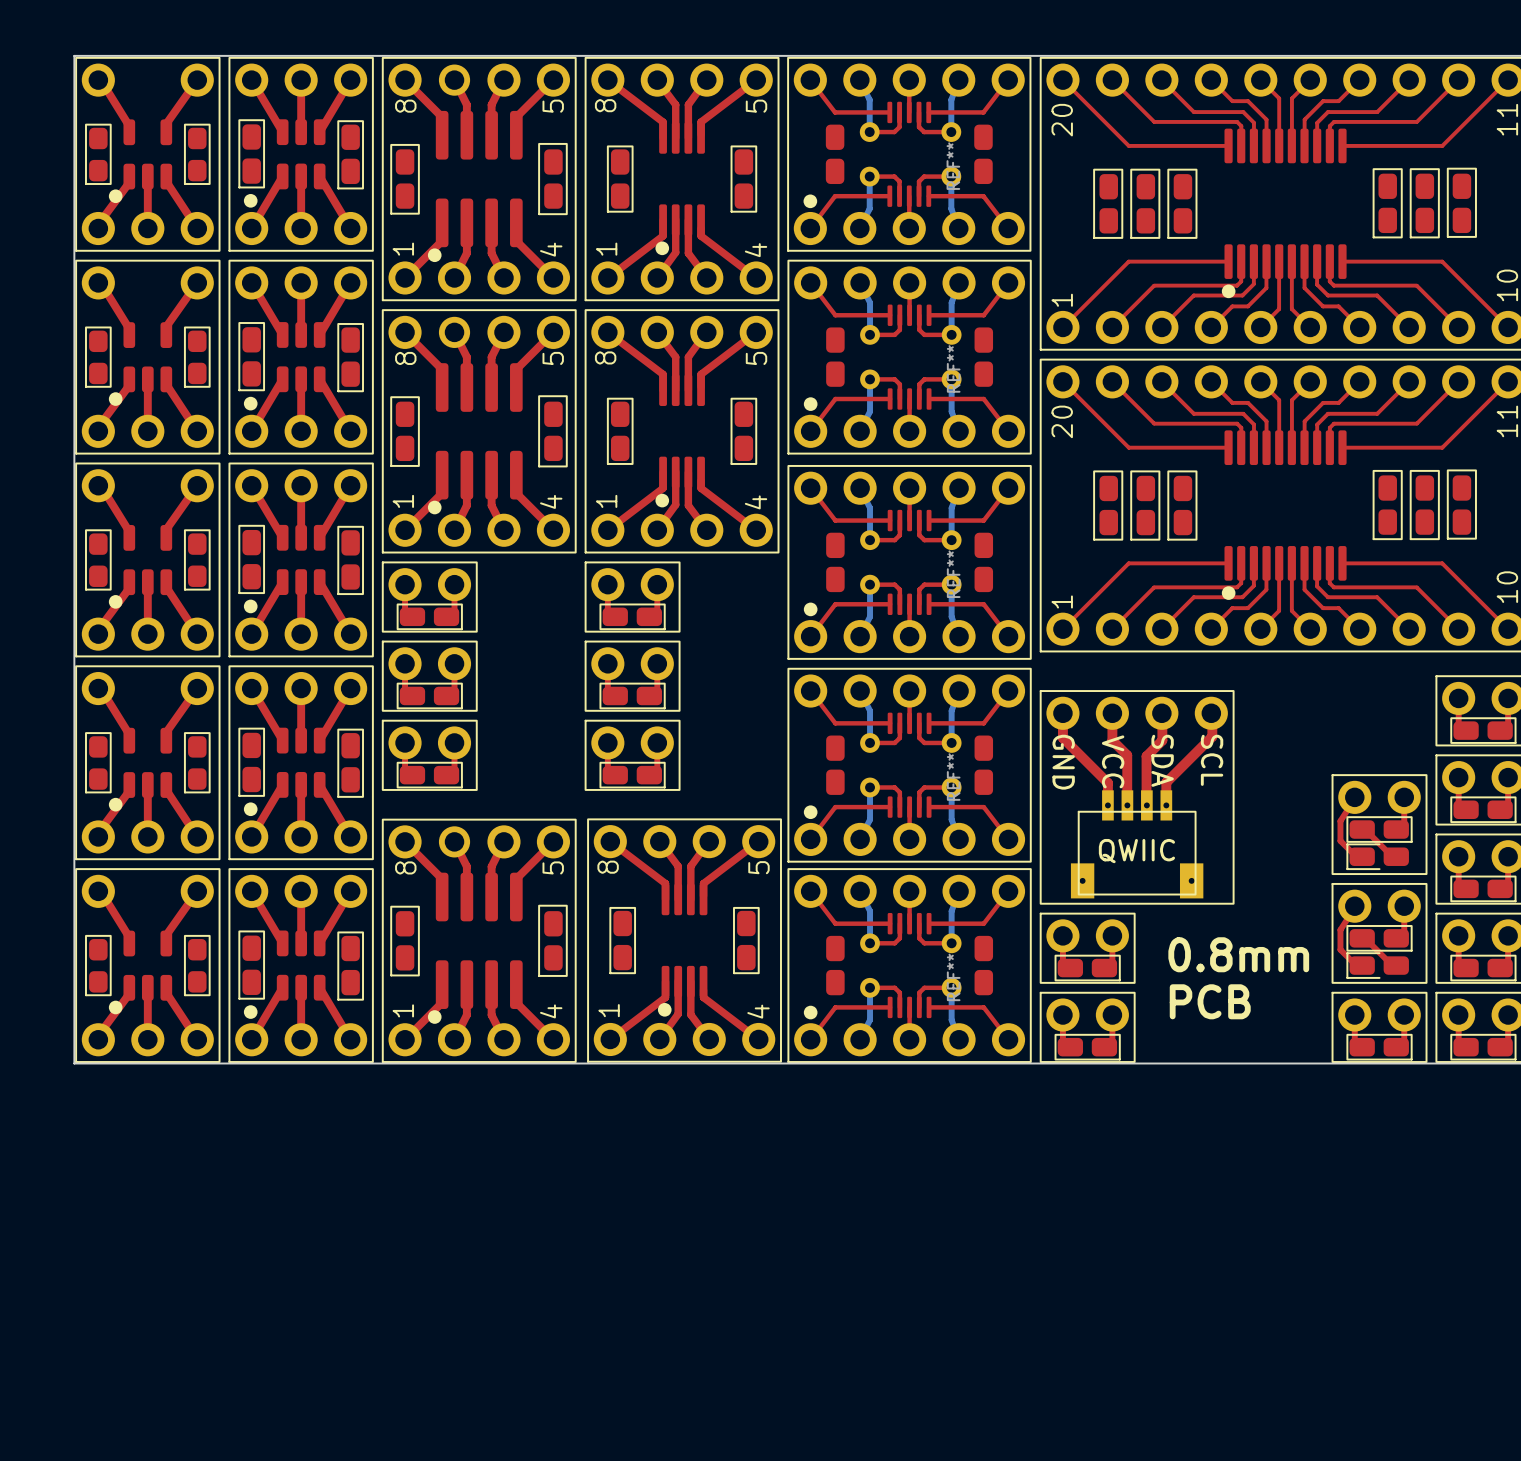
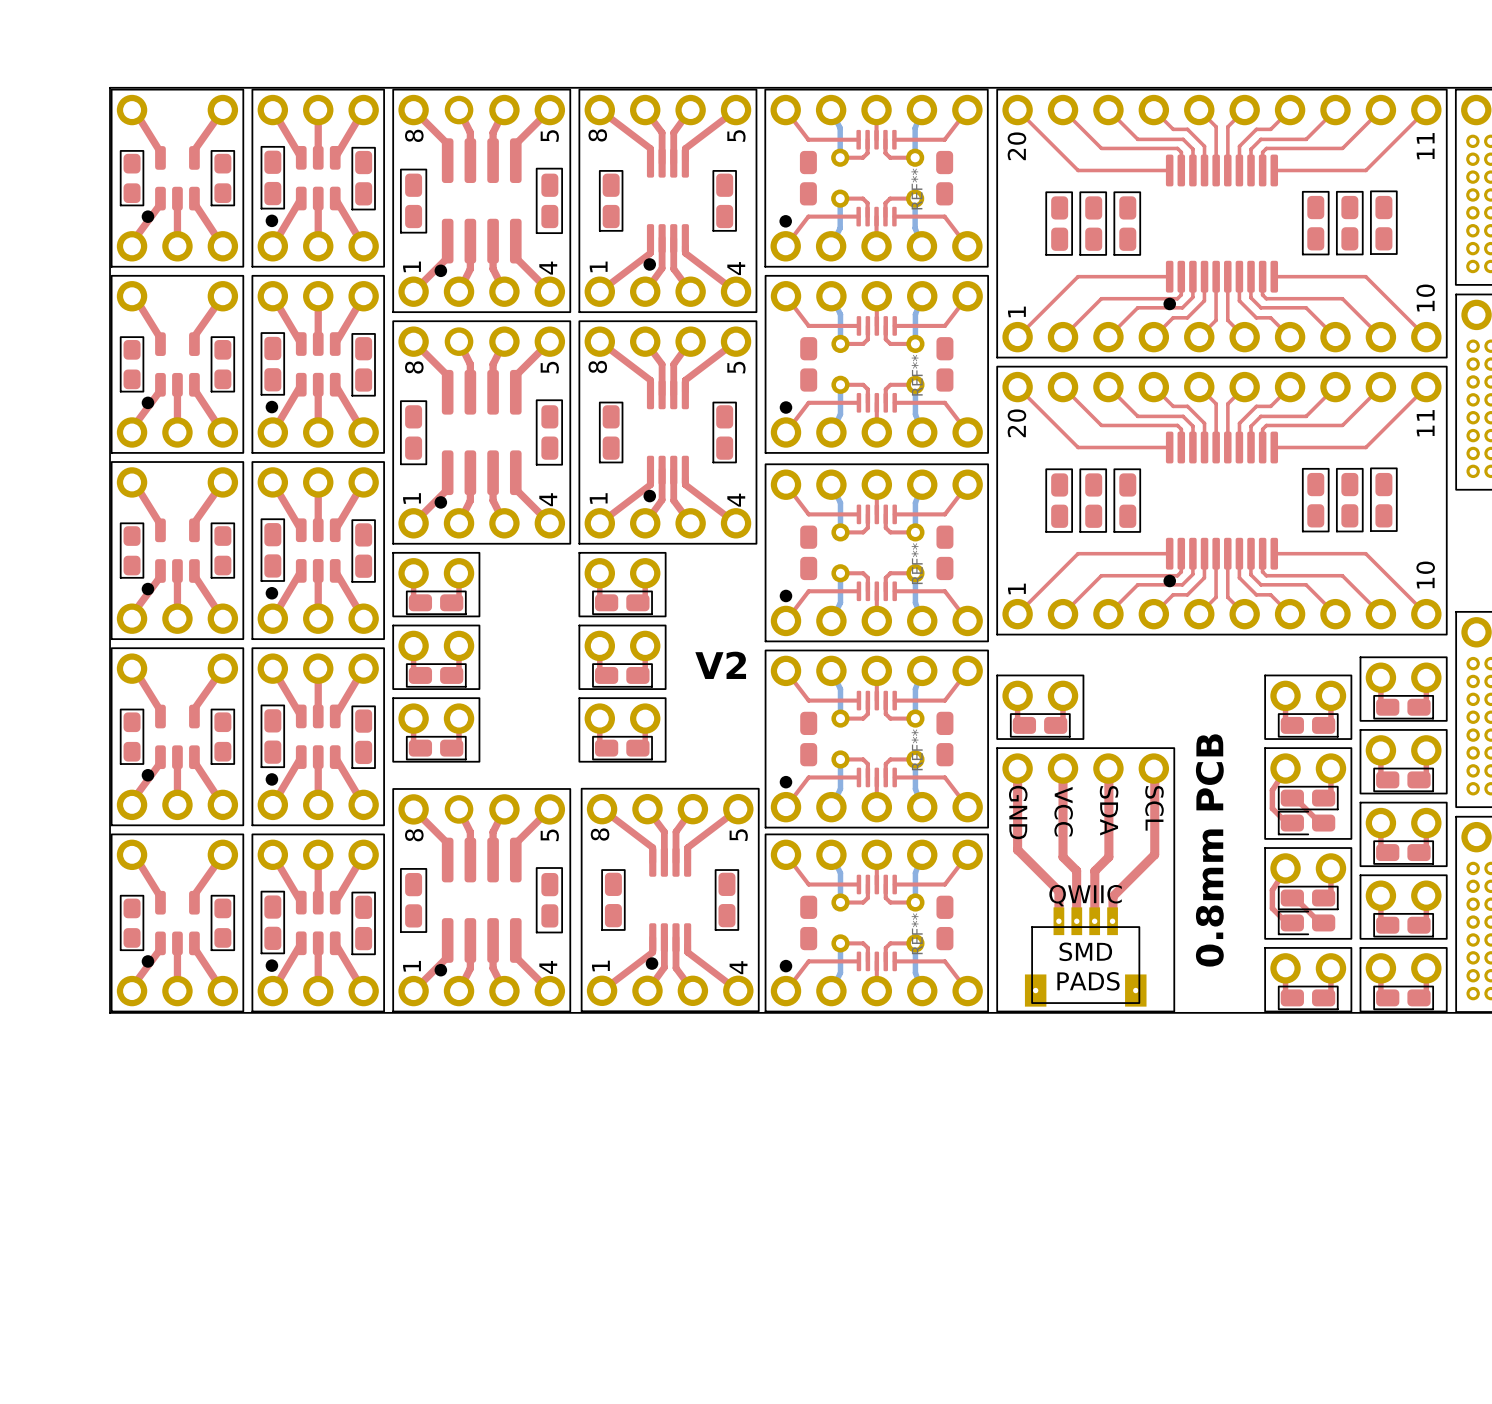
text: none -> V2 (720, 665)
part: none -> (1040, 707)
part: none -> (1308, 707)
part: (1137, 797) -> none
part: none -> (1085, 879)
part: (1087, 948) -> none
text: 0.8mm (1238, 954) -> 0.8mm PCB (1209, 850)
text: PCB (1210, 1001) -> none
part: (1087, 1027) -> none

